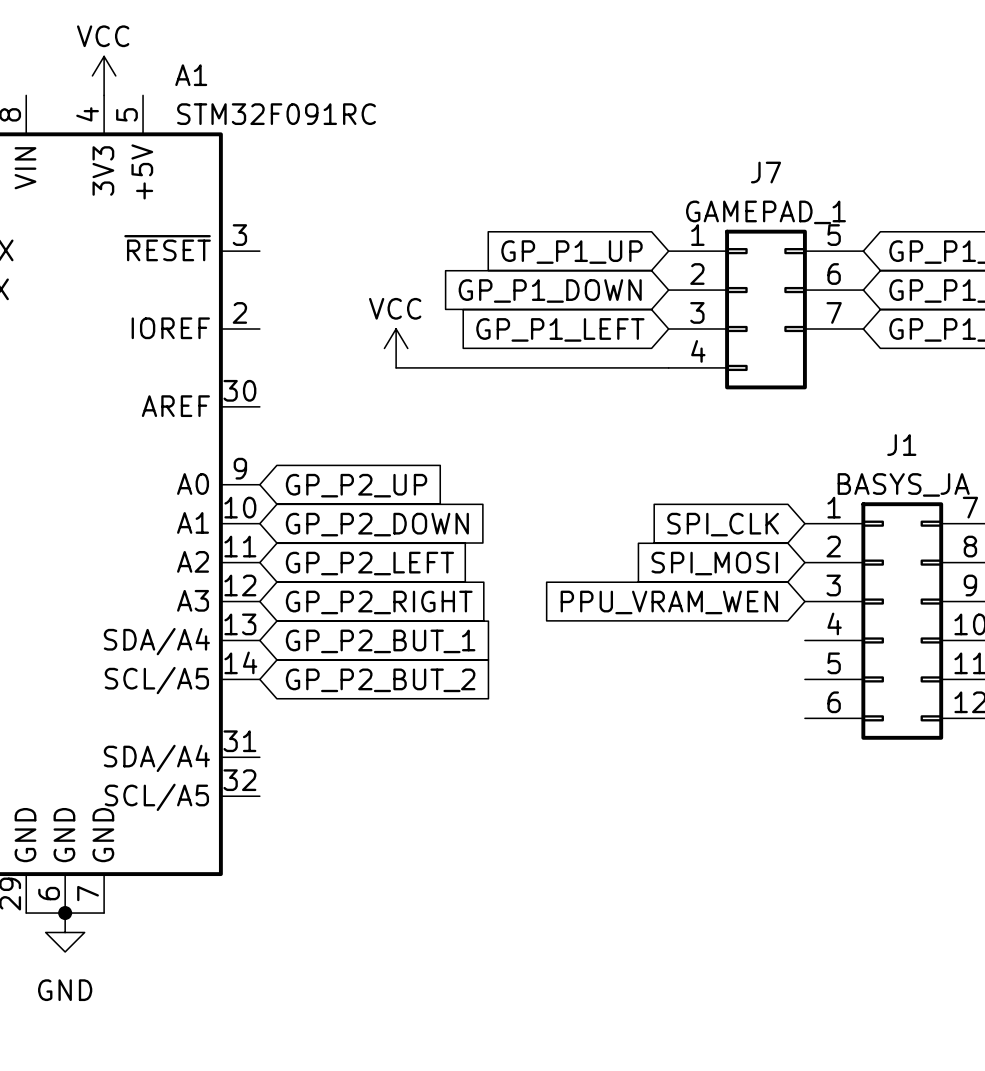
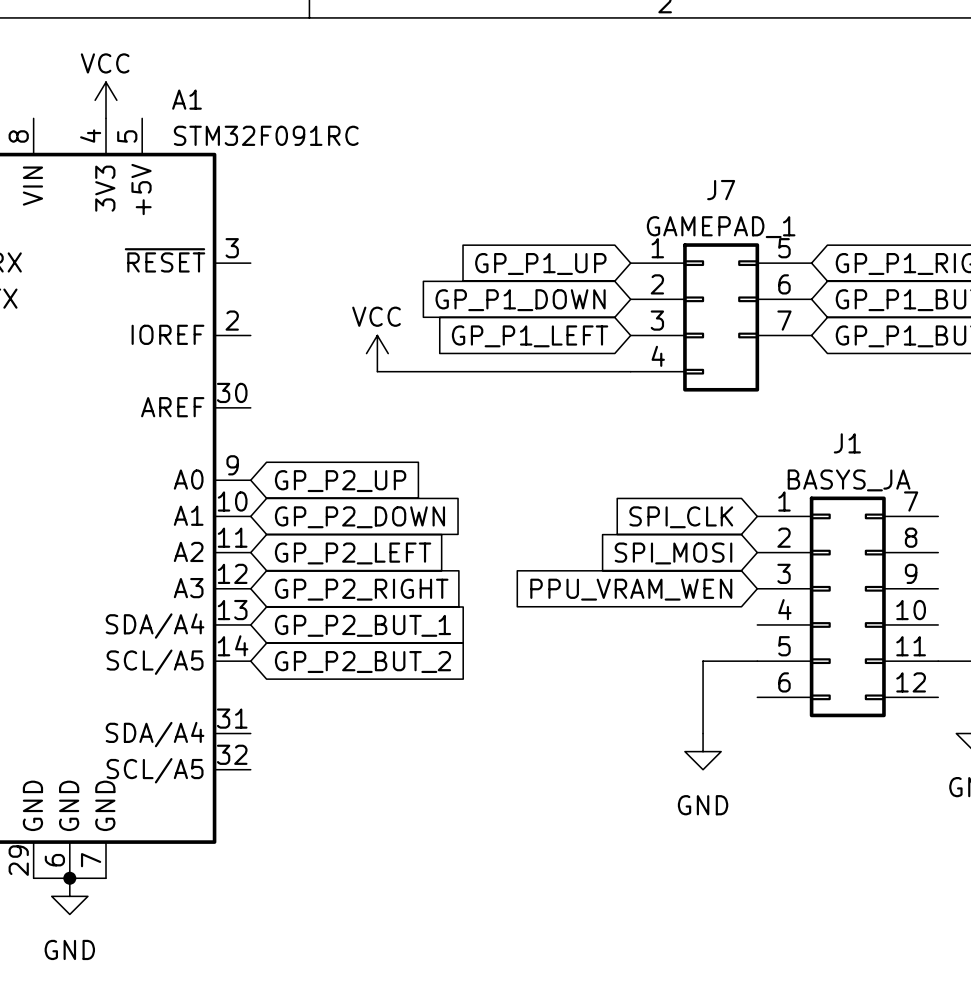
wire: none -> (757, 661) (703, 661) (703, 733)
power symbol: none -> GND (703, 751)

